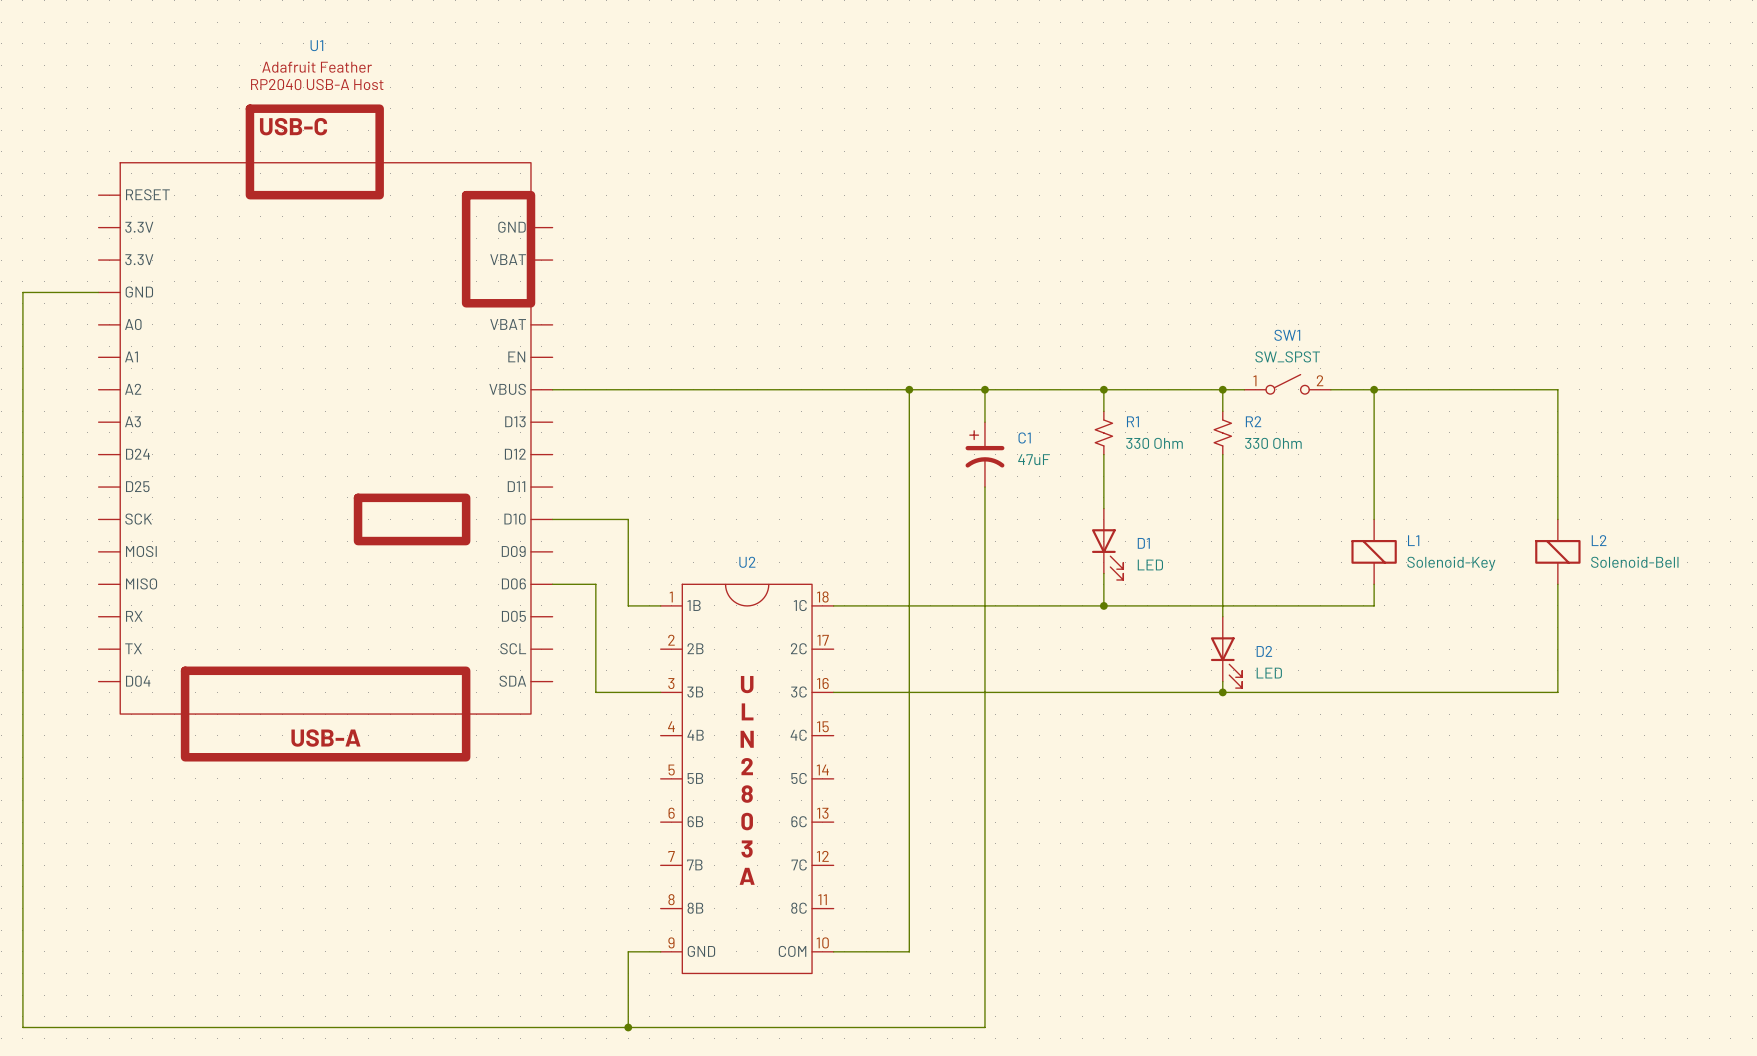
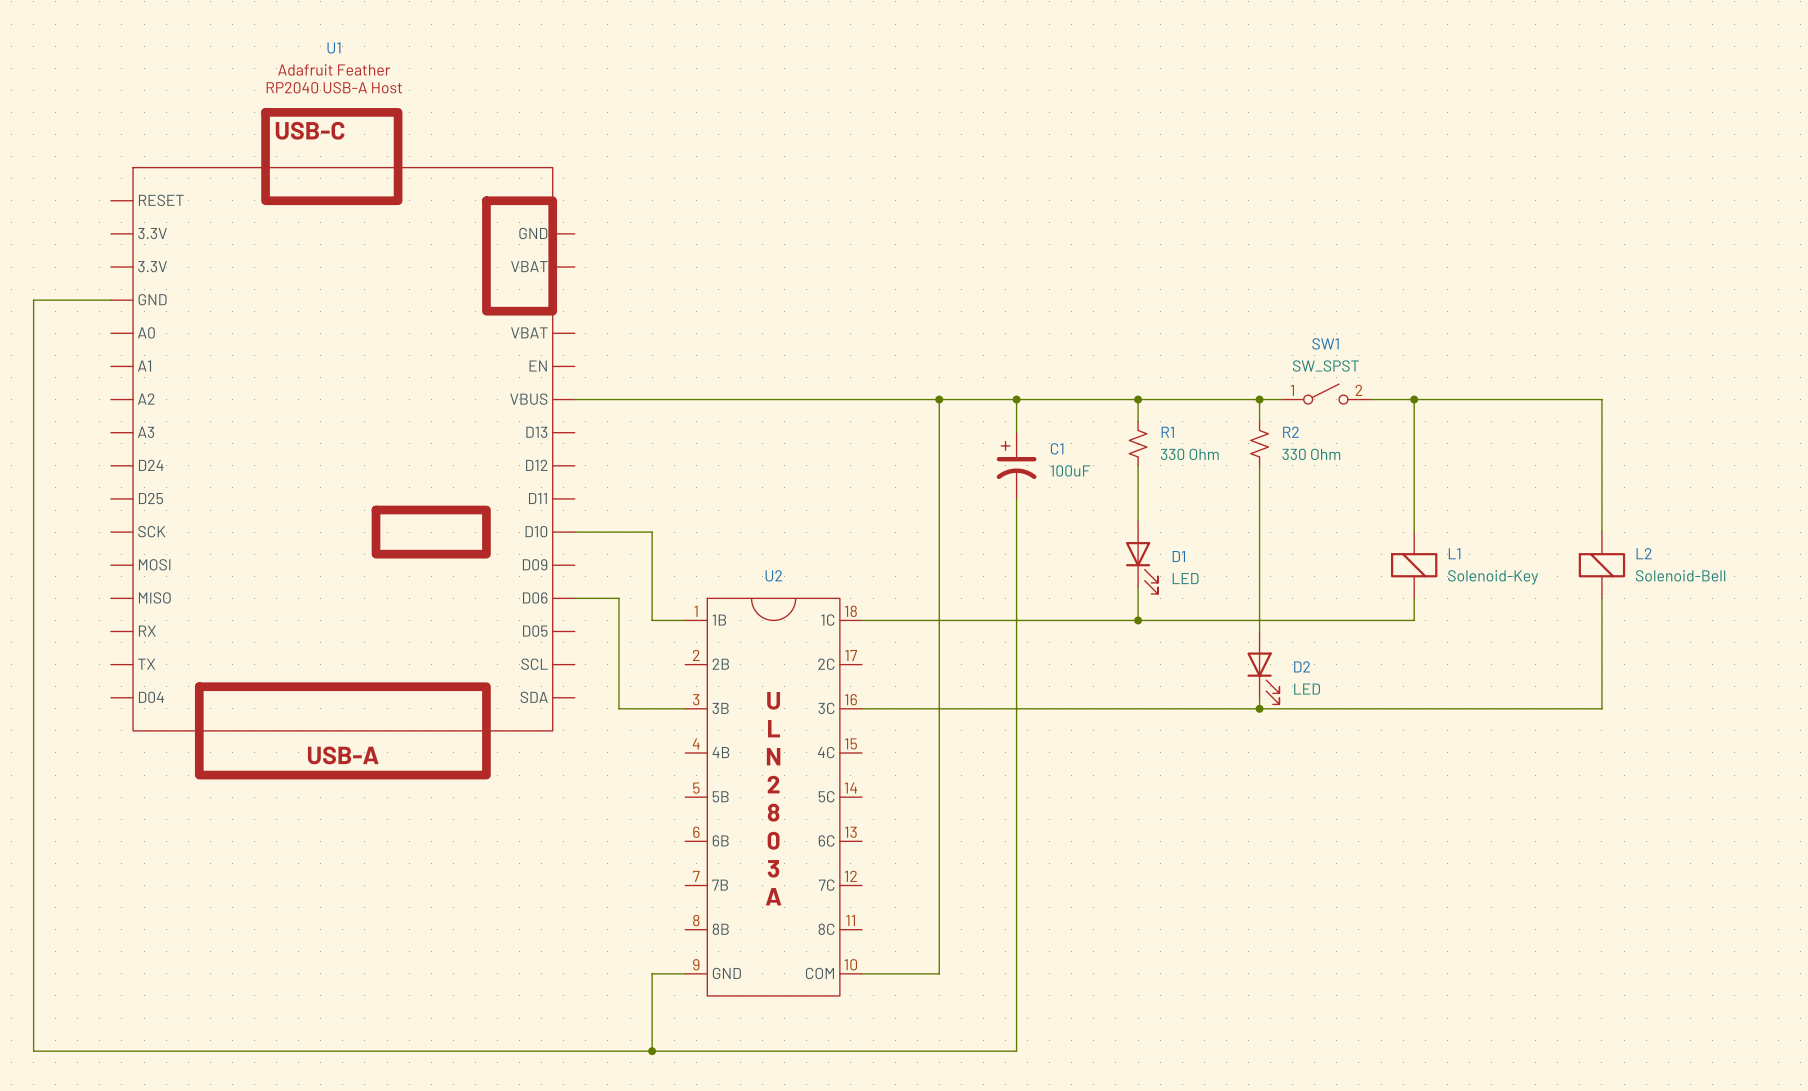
C1 value: 47uF (1034, 459) -> 100uF (1070, 470)

